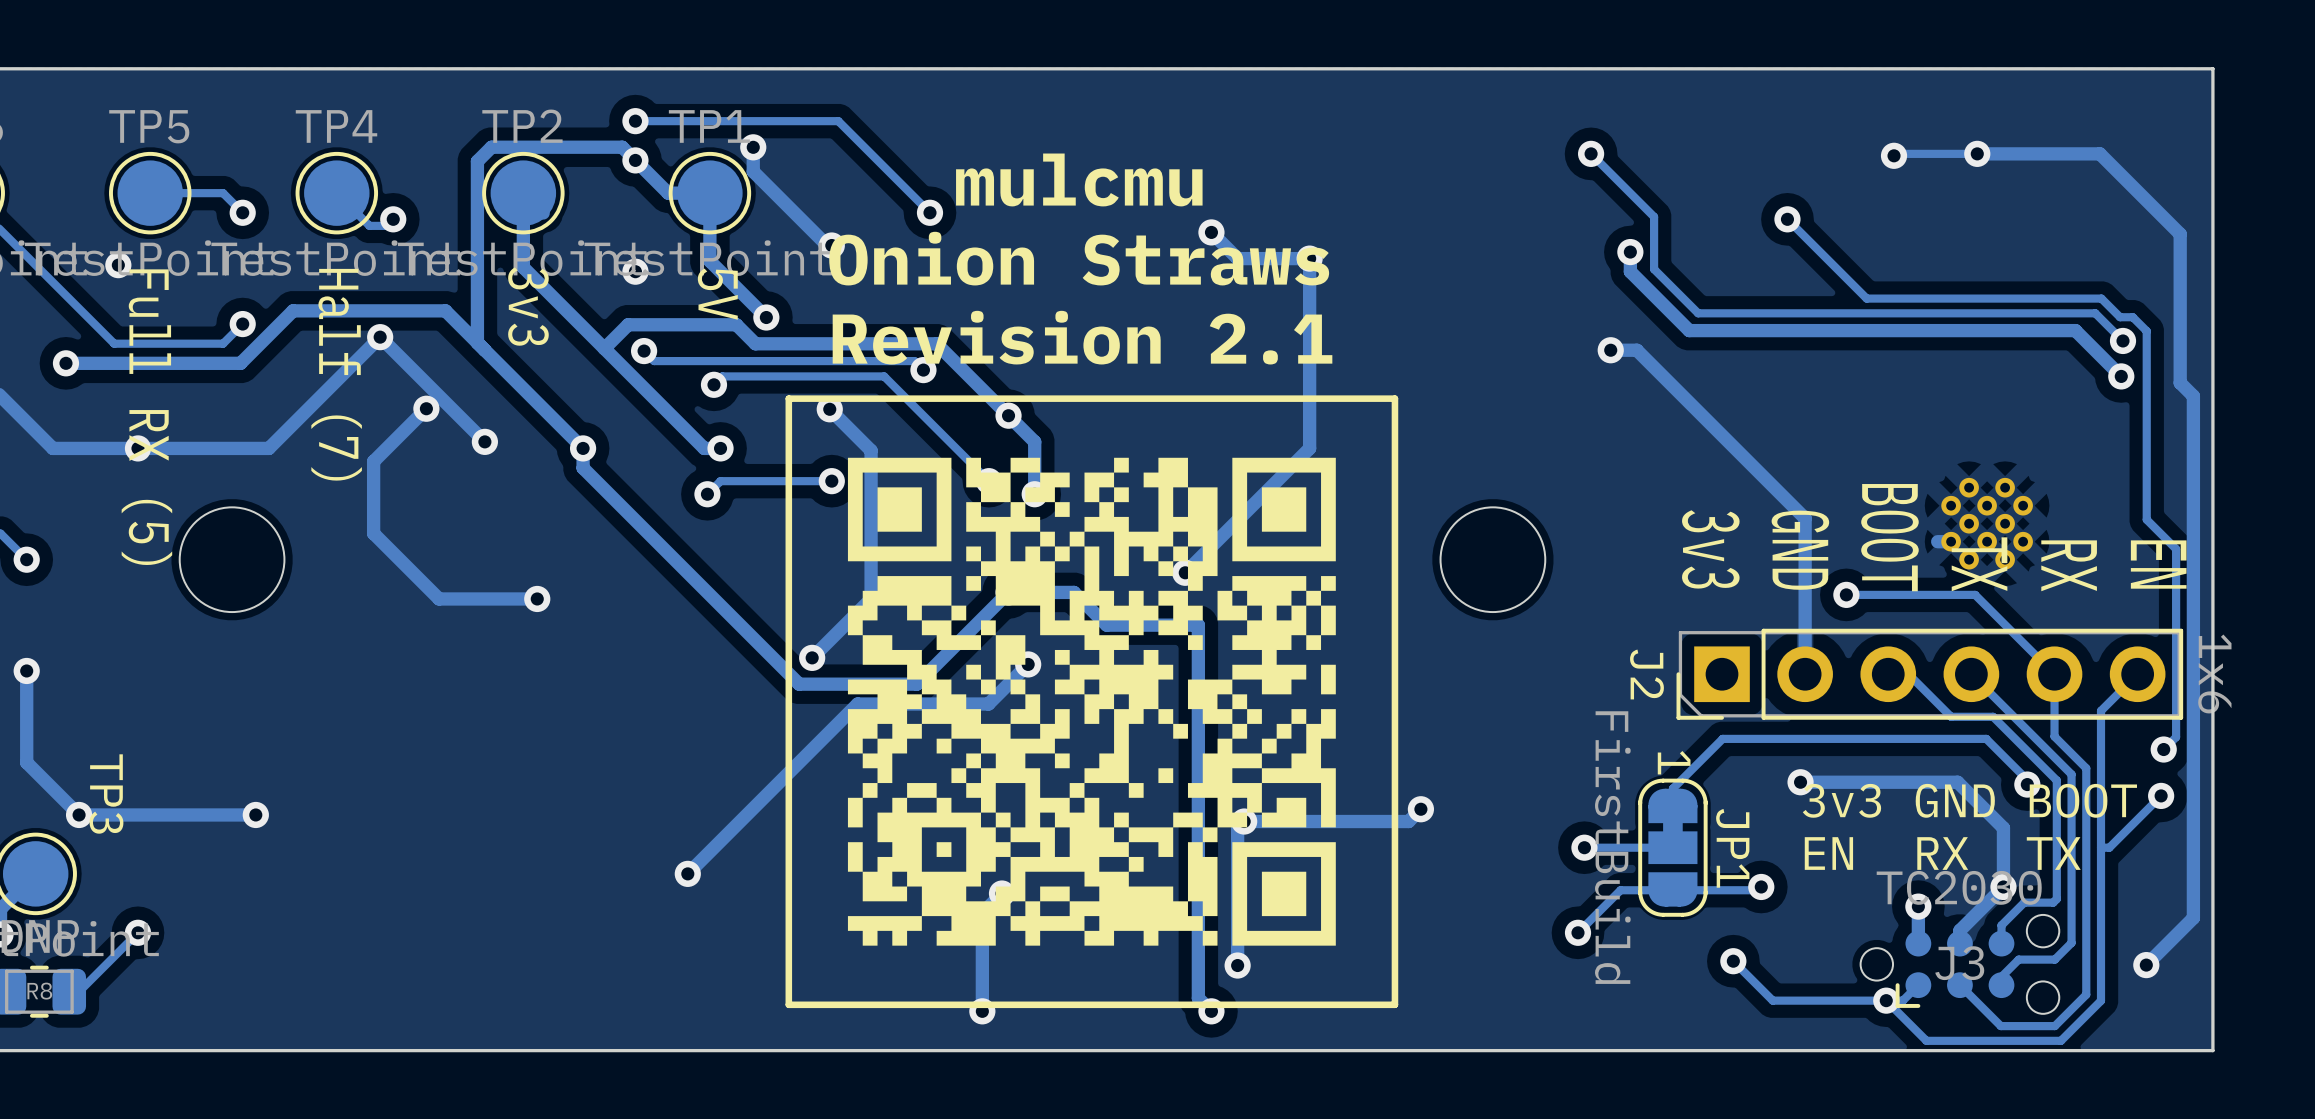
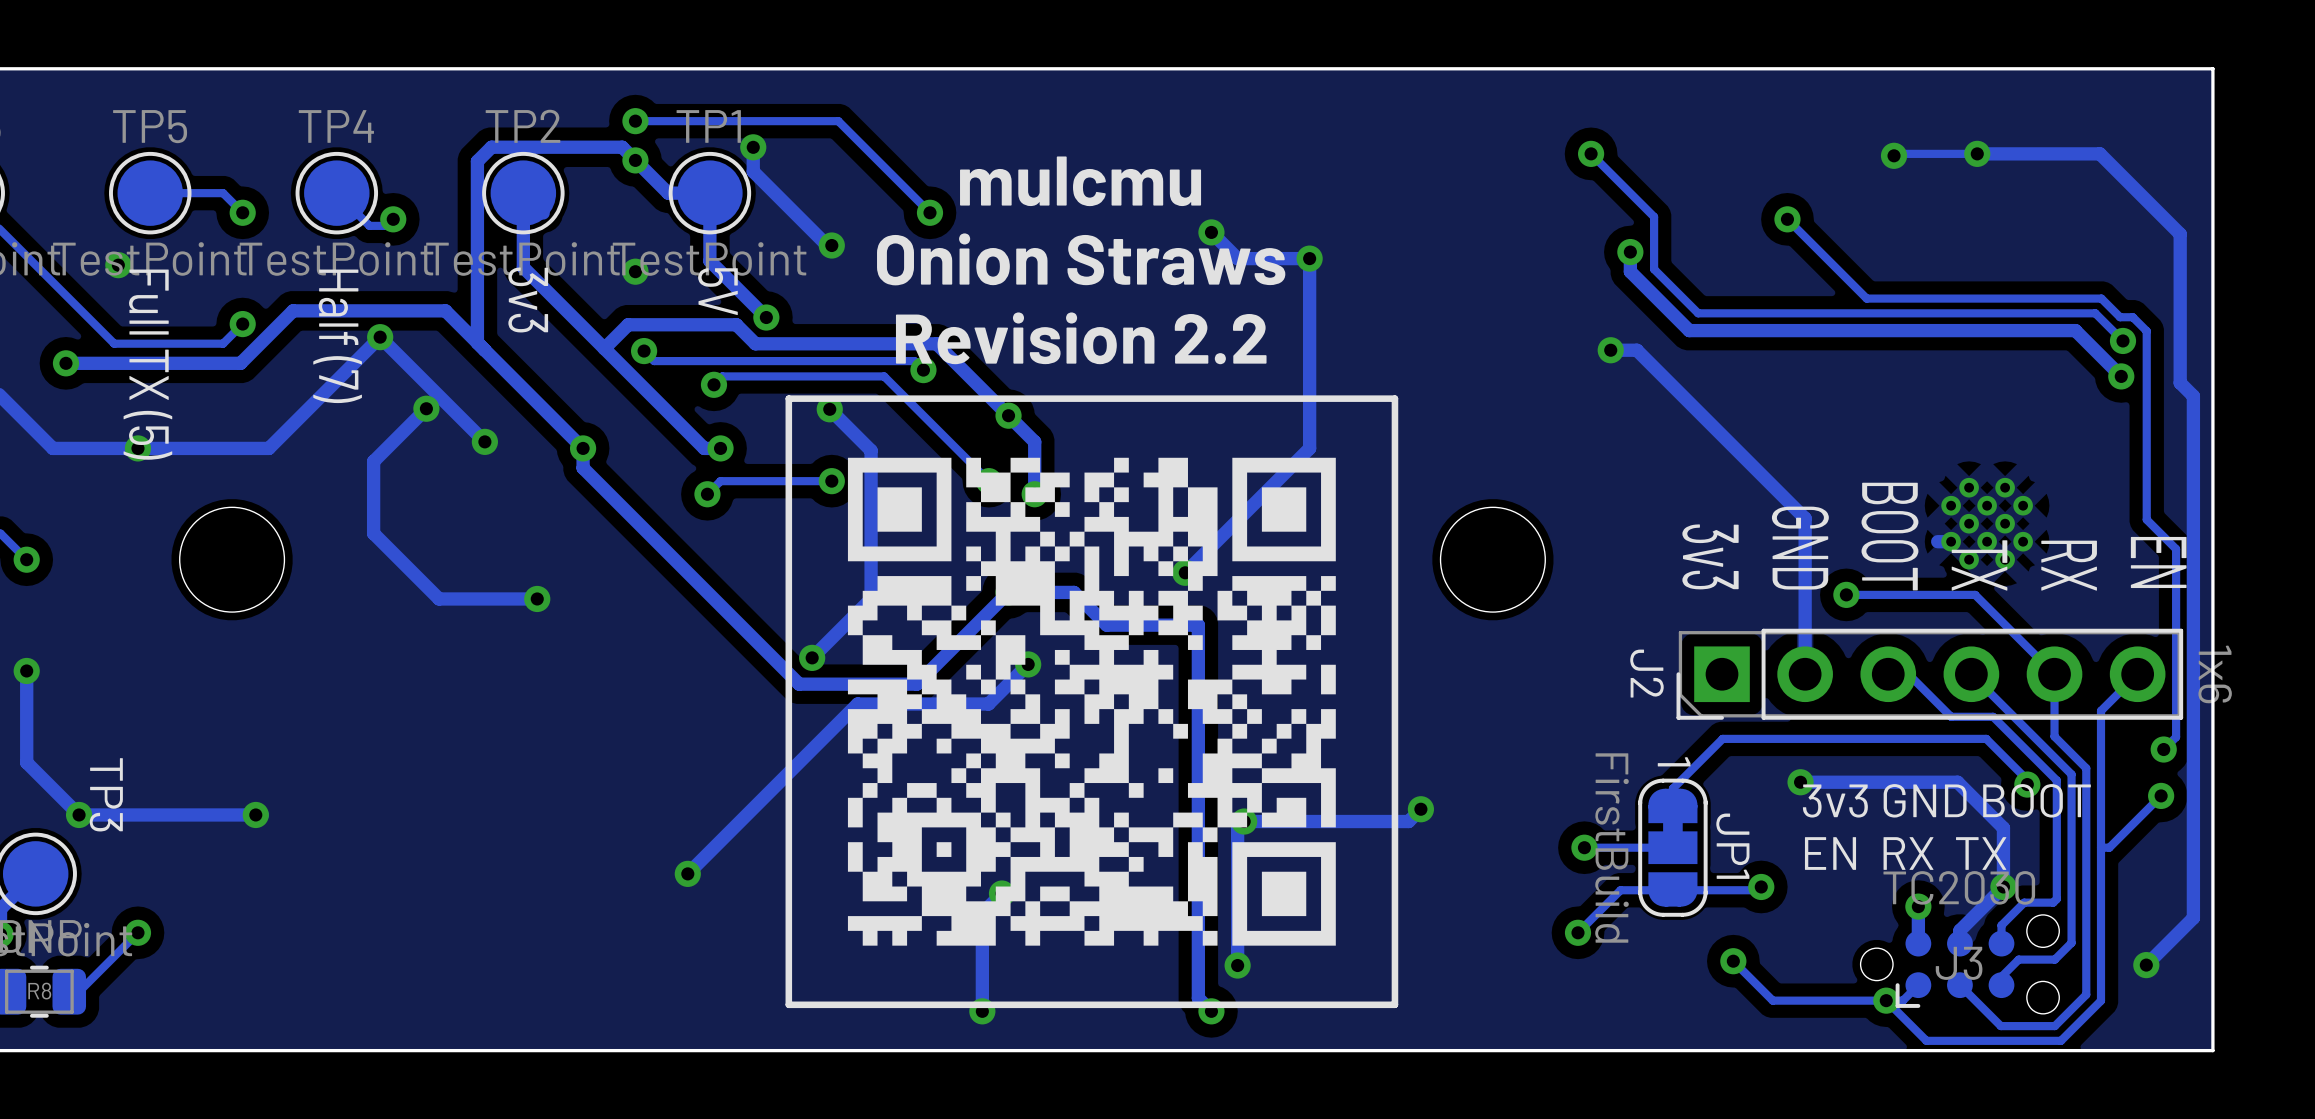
text: Revision 2.1 (1082, 337) -> Revision 2.2 (1081, 338)
text: Full RX (5) (146, 417) -> Full TX (5) (147, 364)

